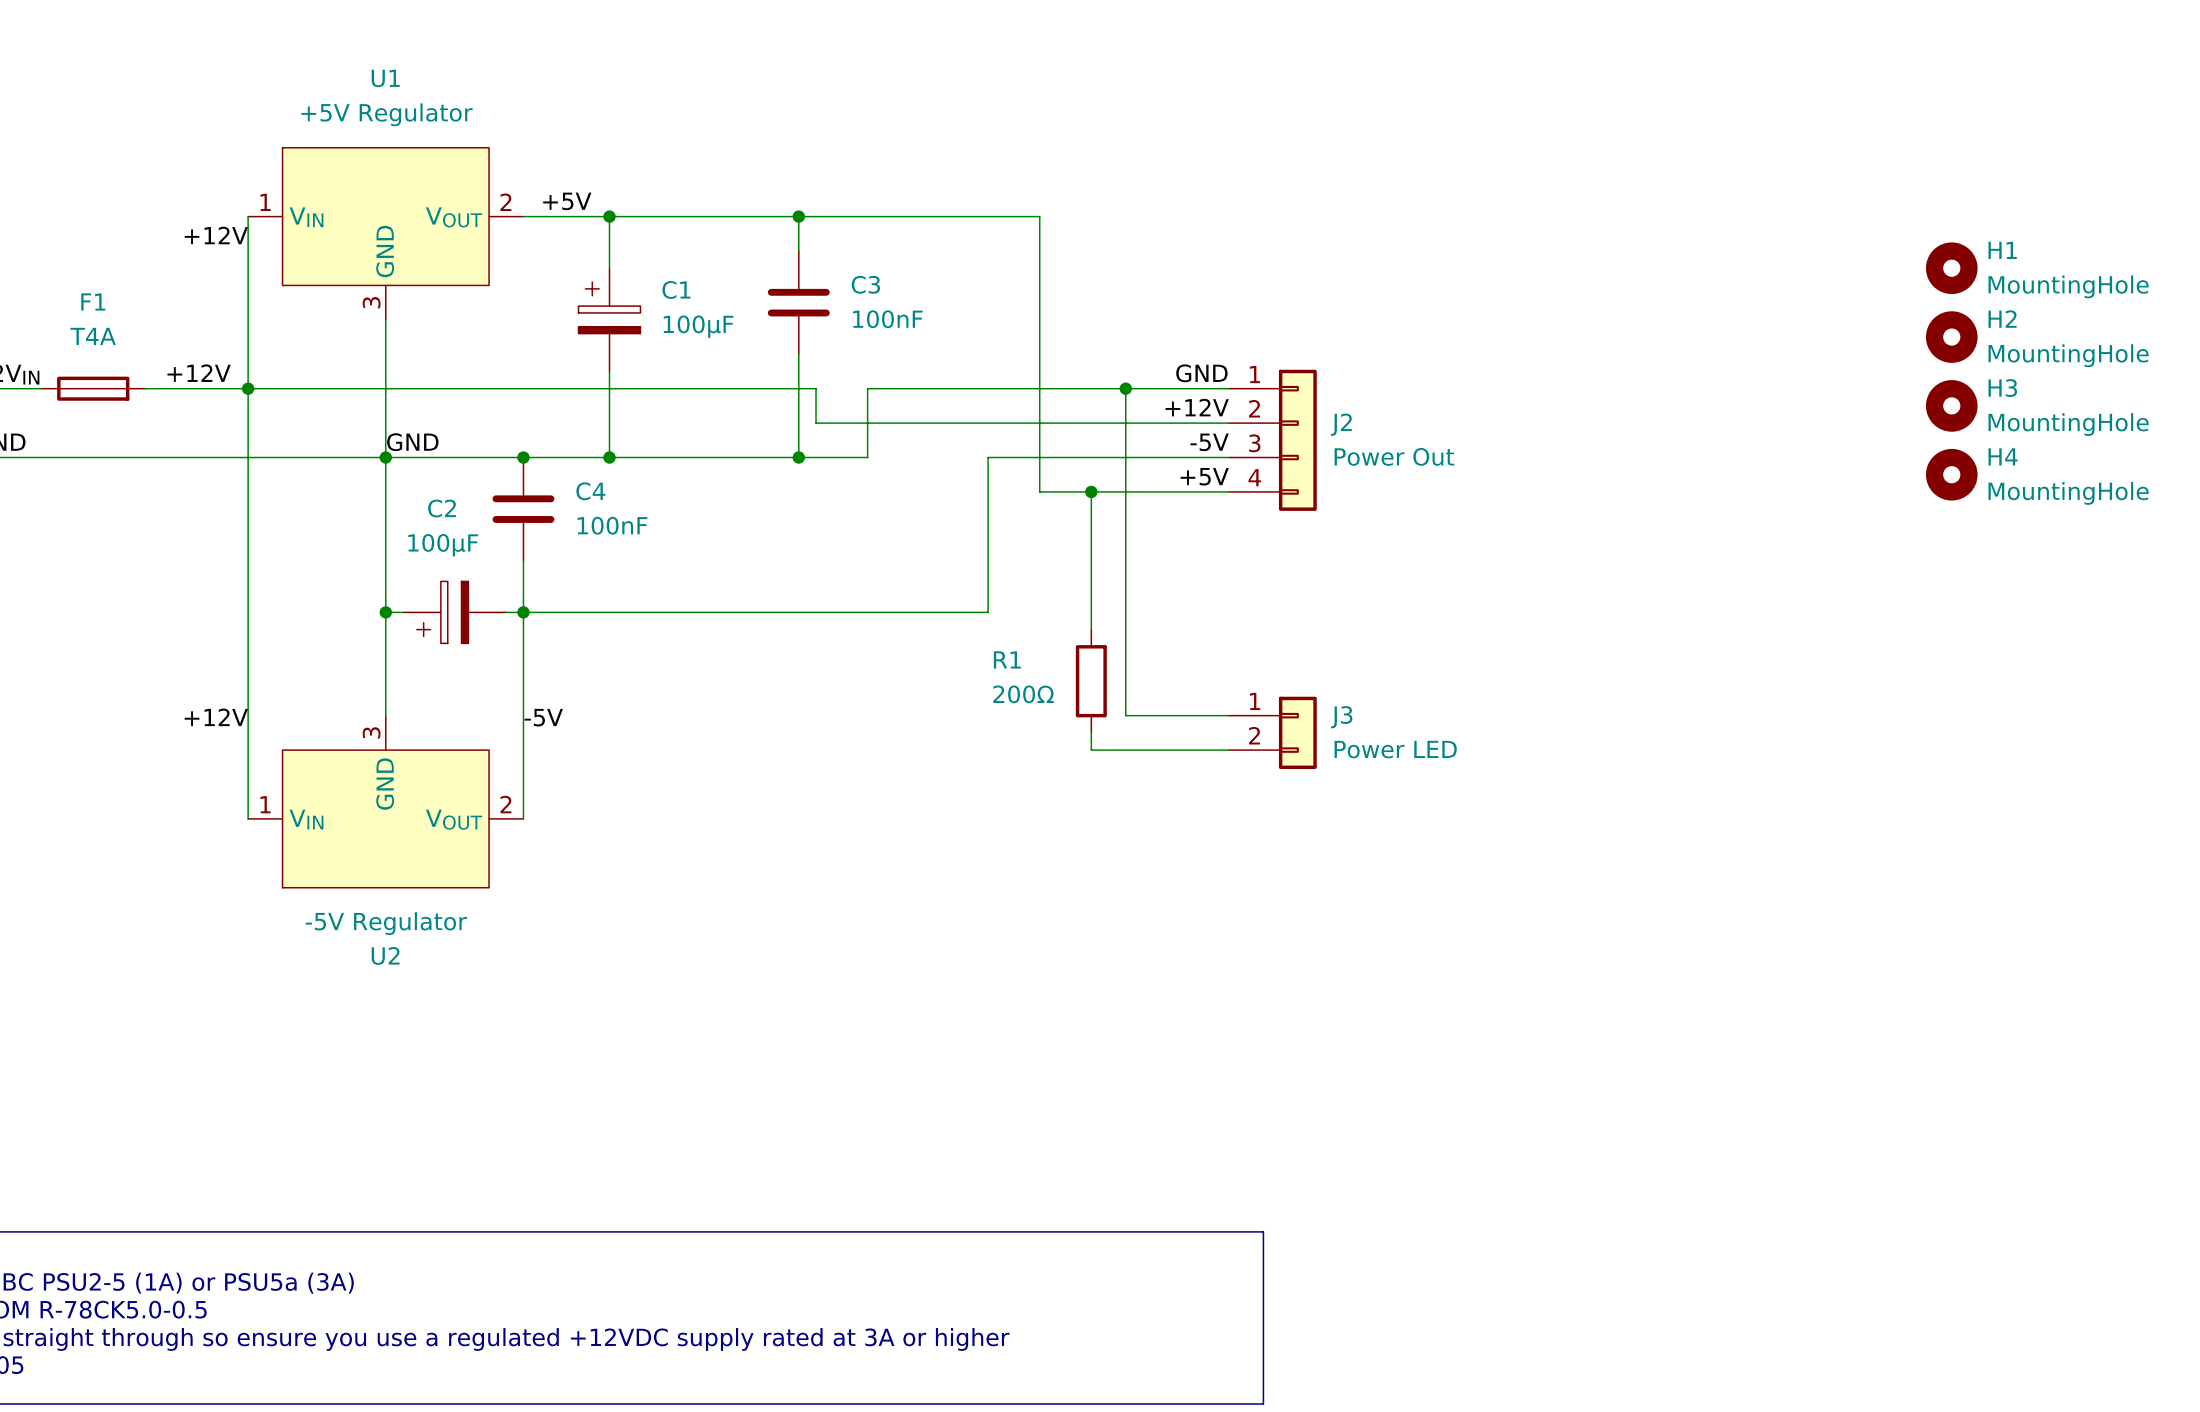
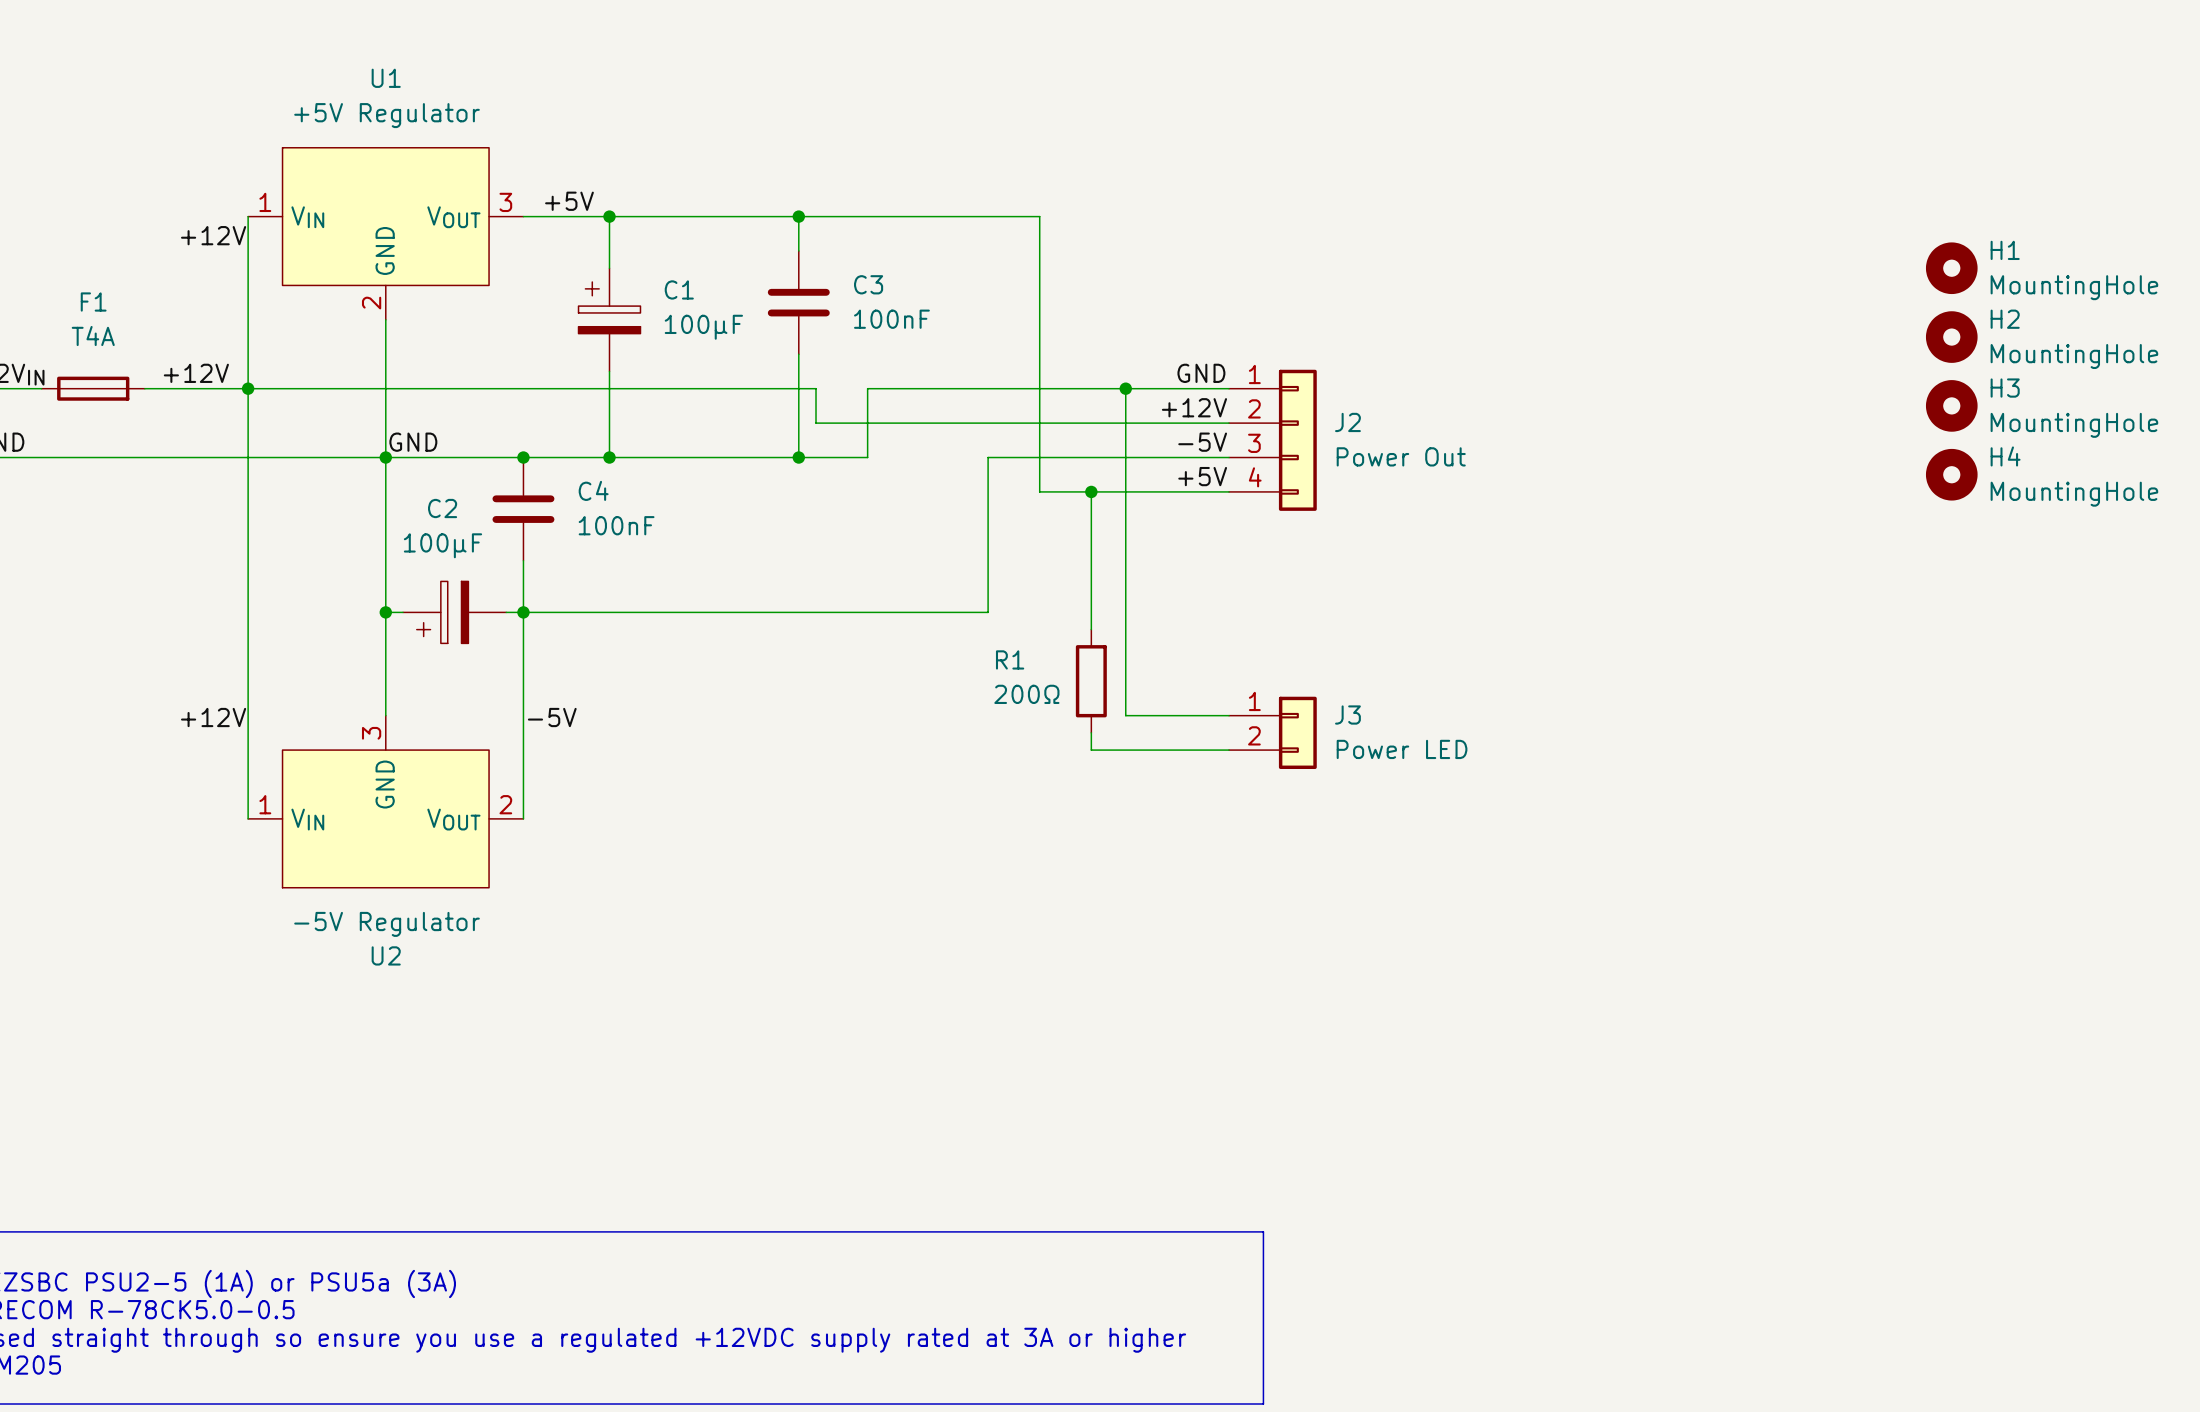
U1 pin number: 2 (505, 202) -> 3 (505, 202)
U1 pin number: 3 (371, 302) -> 2 (371, 303)

